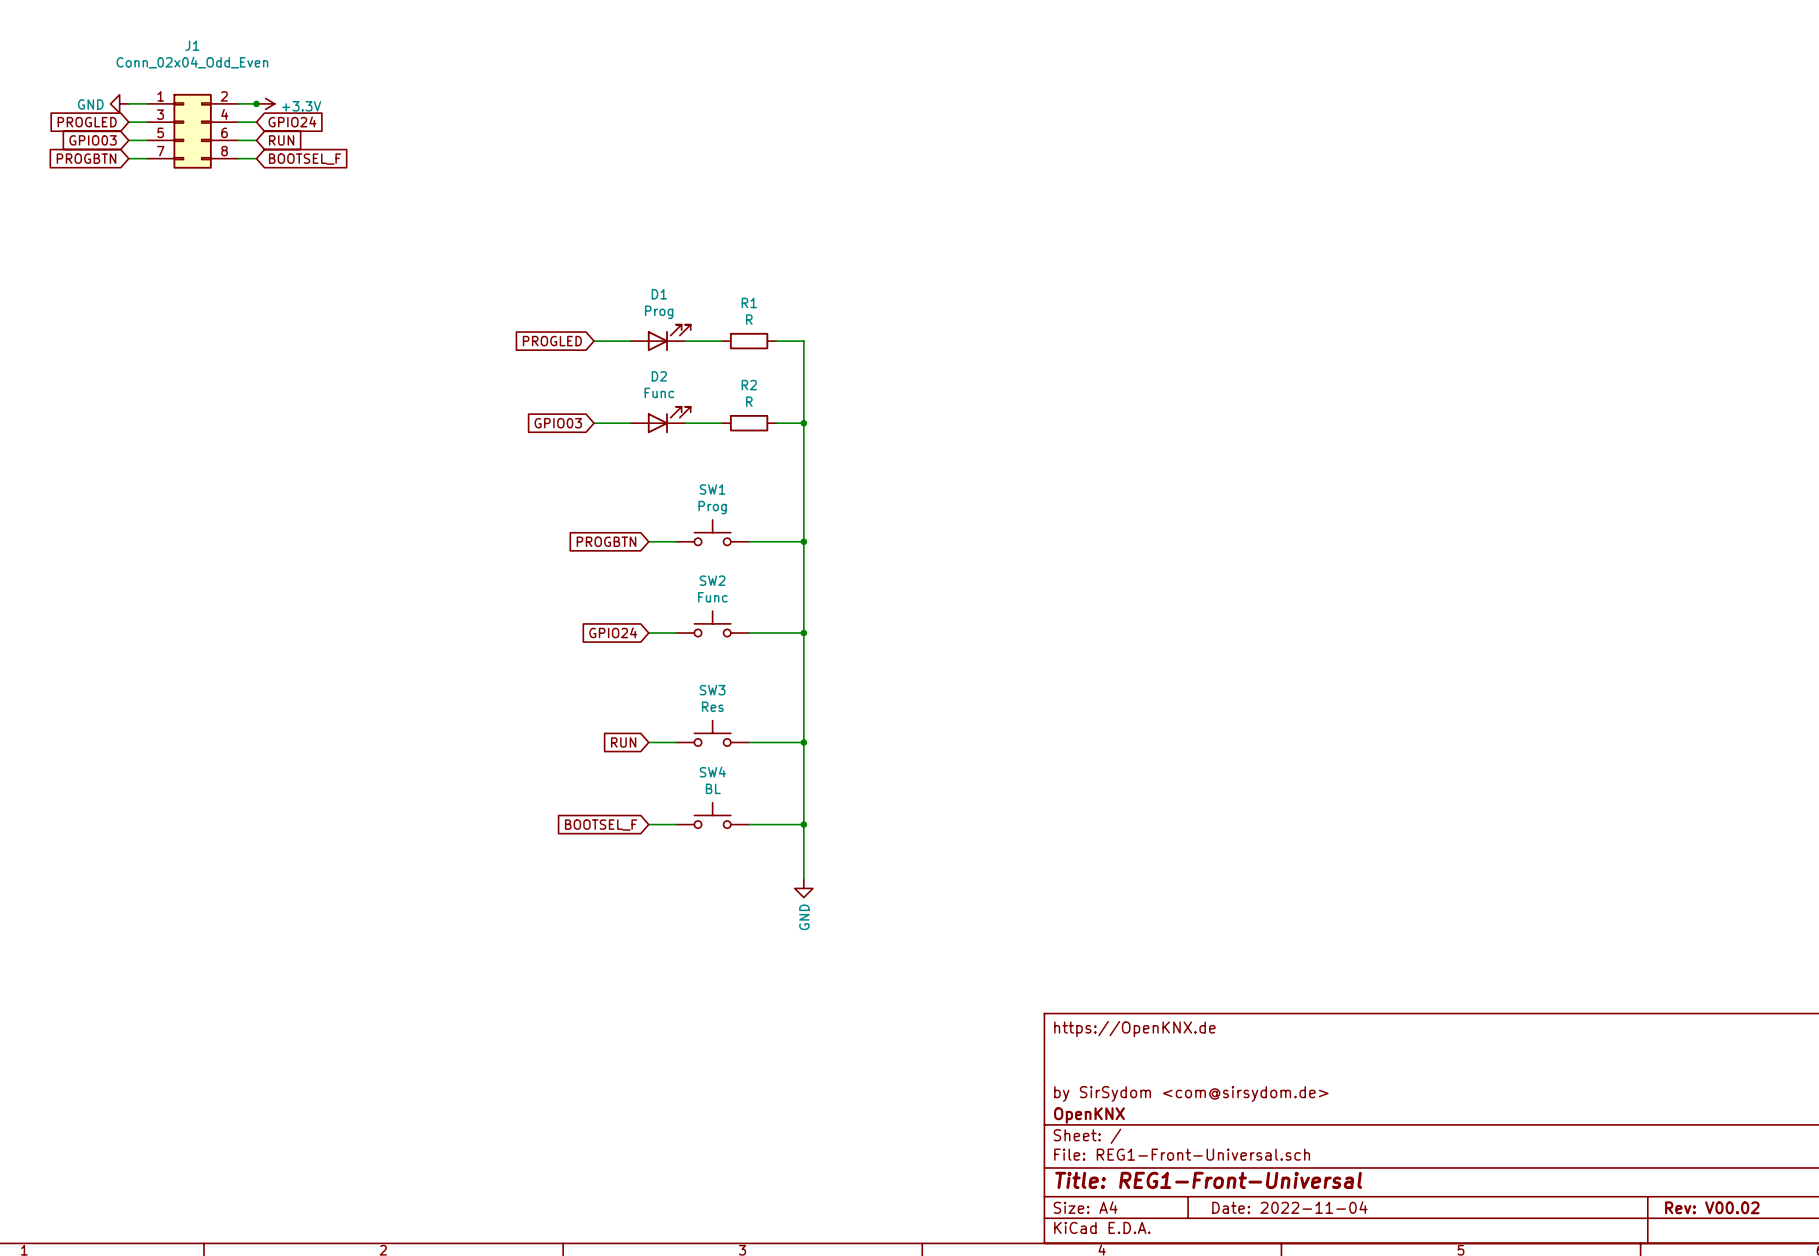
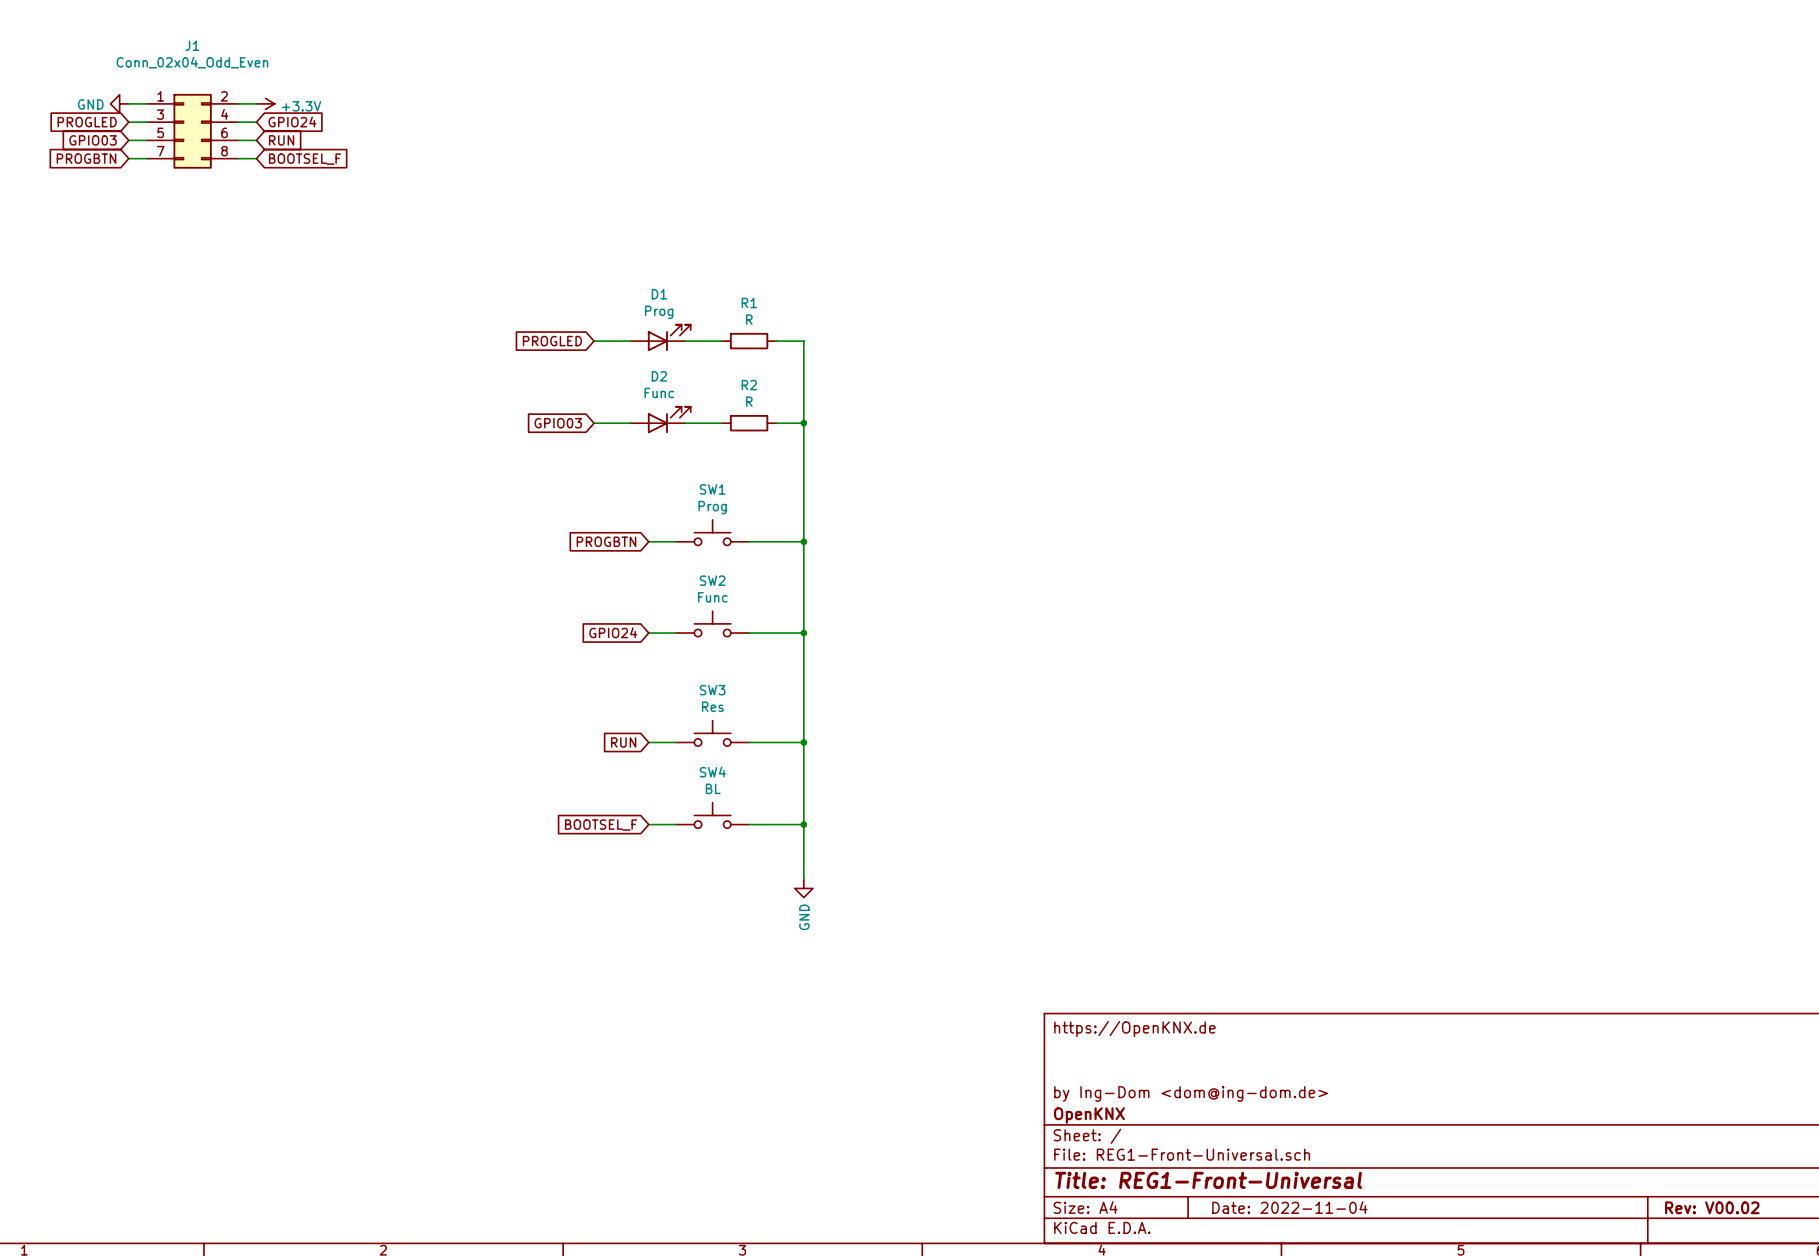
junction: (256, 103) -> none
title block: by SirSydom <com@sirsydom.de> (1191, 1093) -> by Ing-Dom <dom@ing-dom.de> (1191, 1093)

